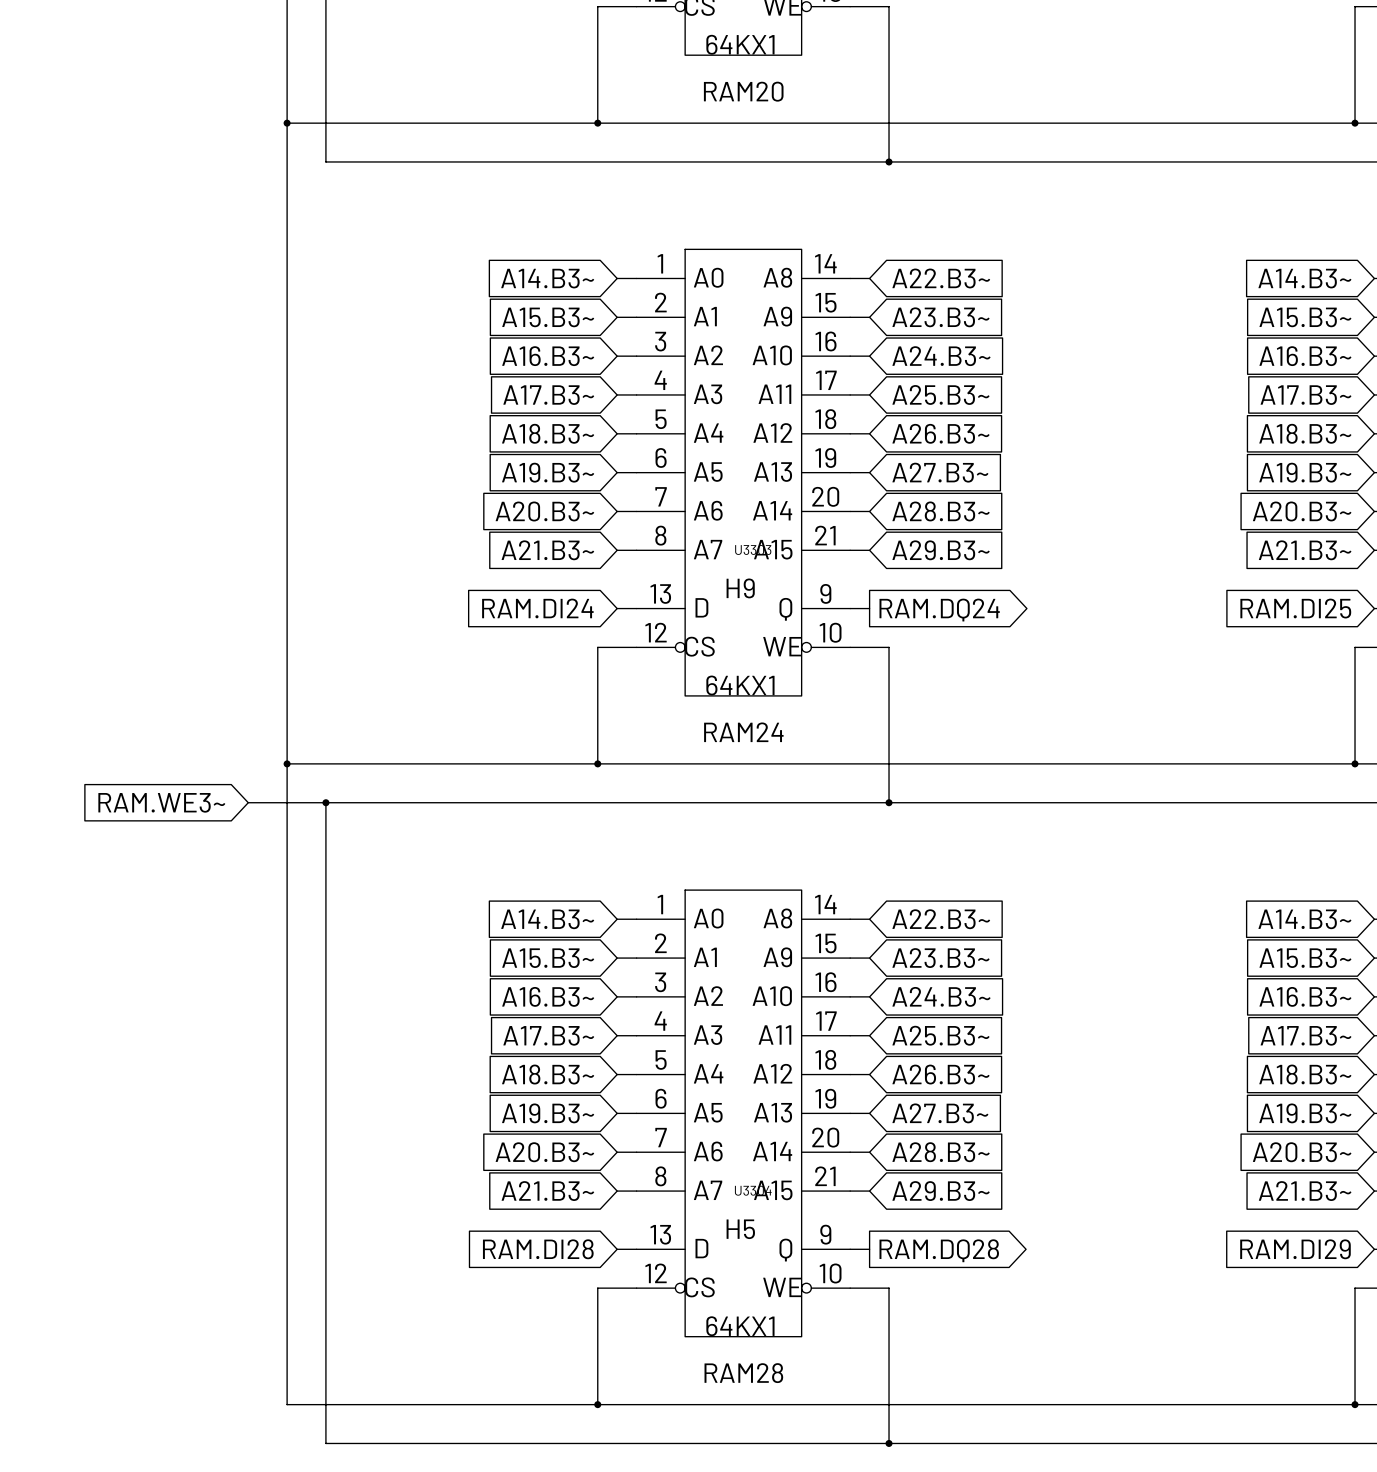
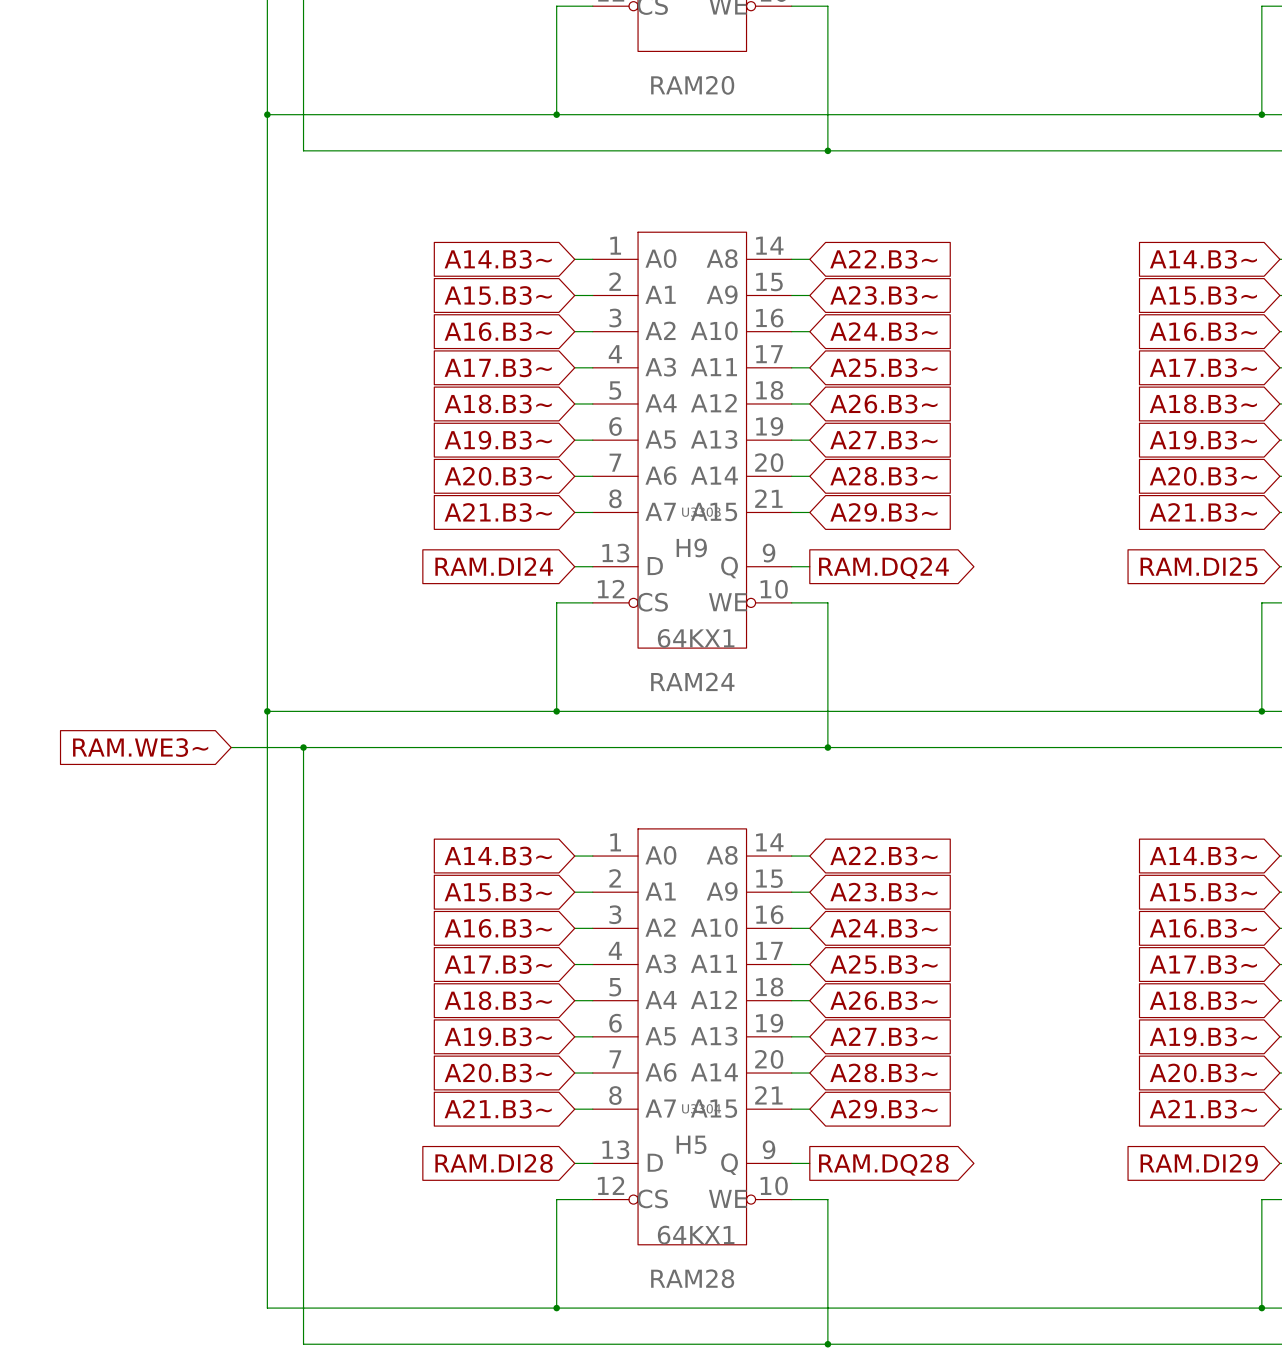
part value: 64KX1 (740, 44) -> none

